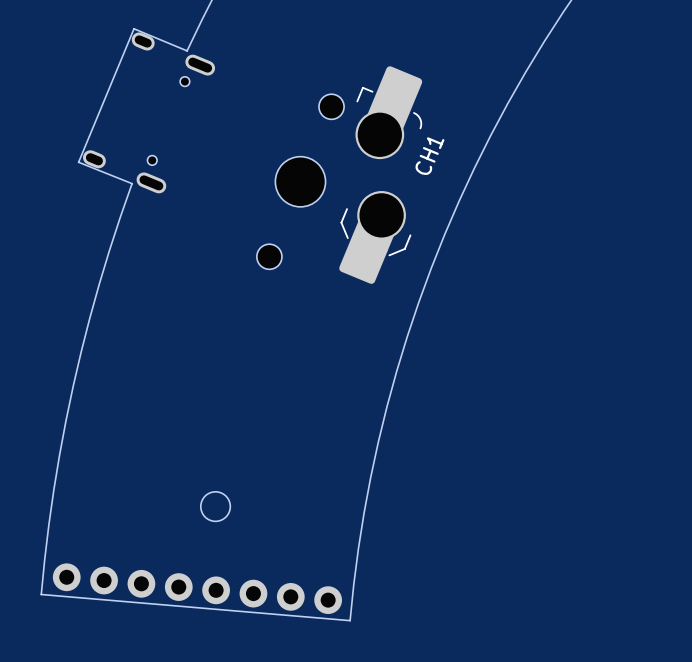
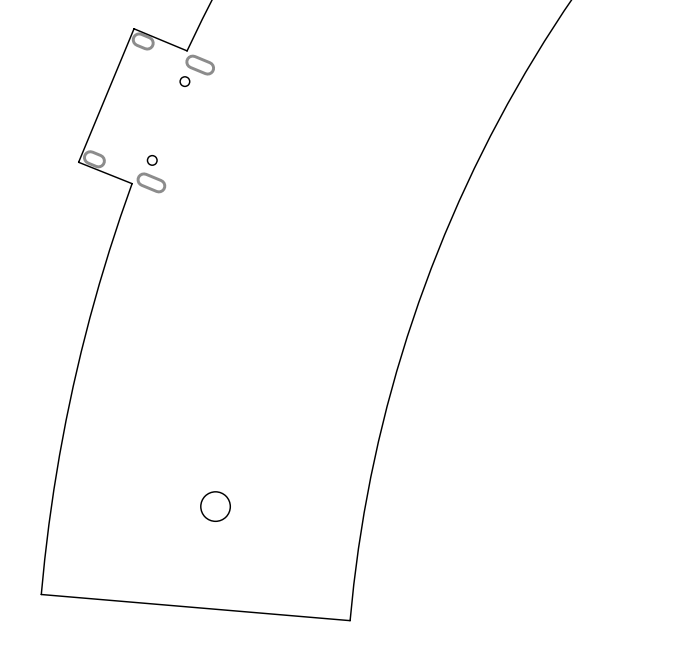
CH1: (339, 175) -> none
part: (197, 588) -> none

